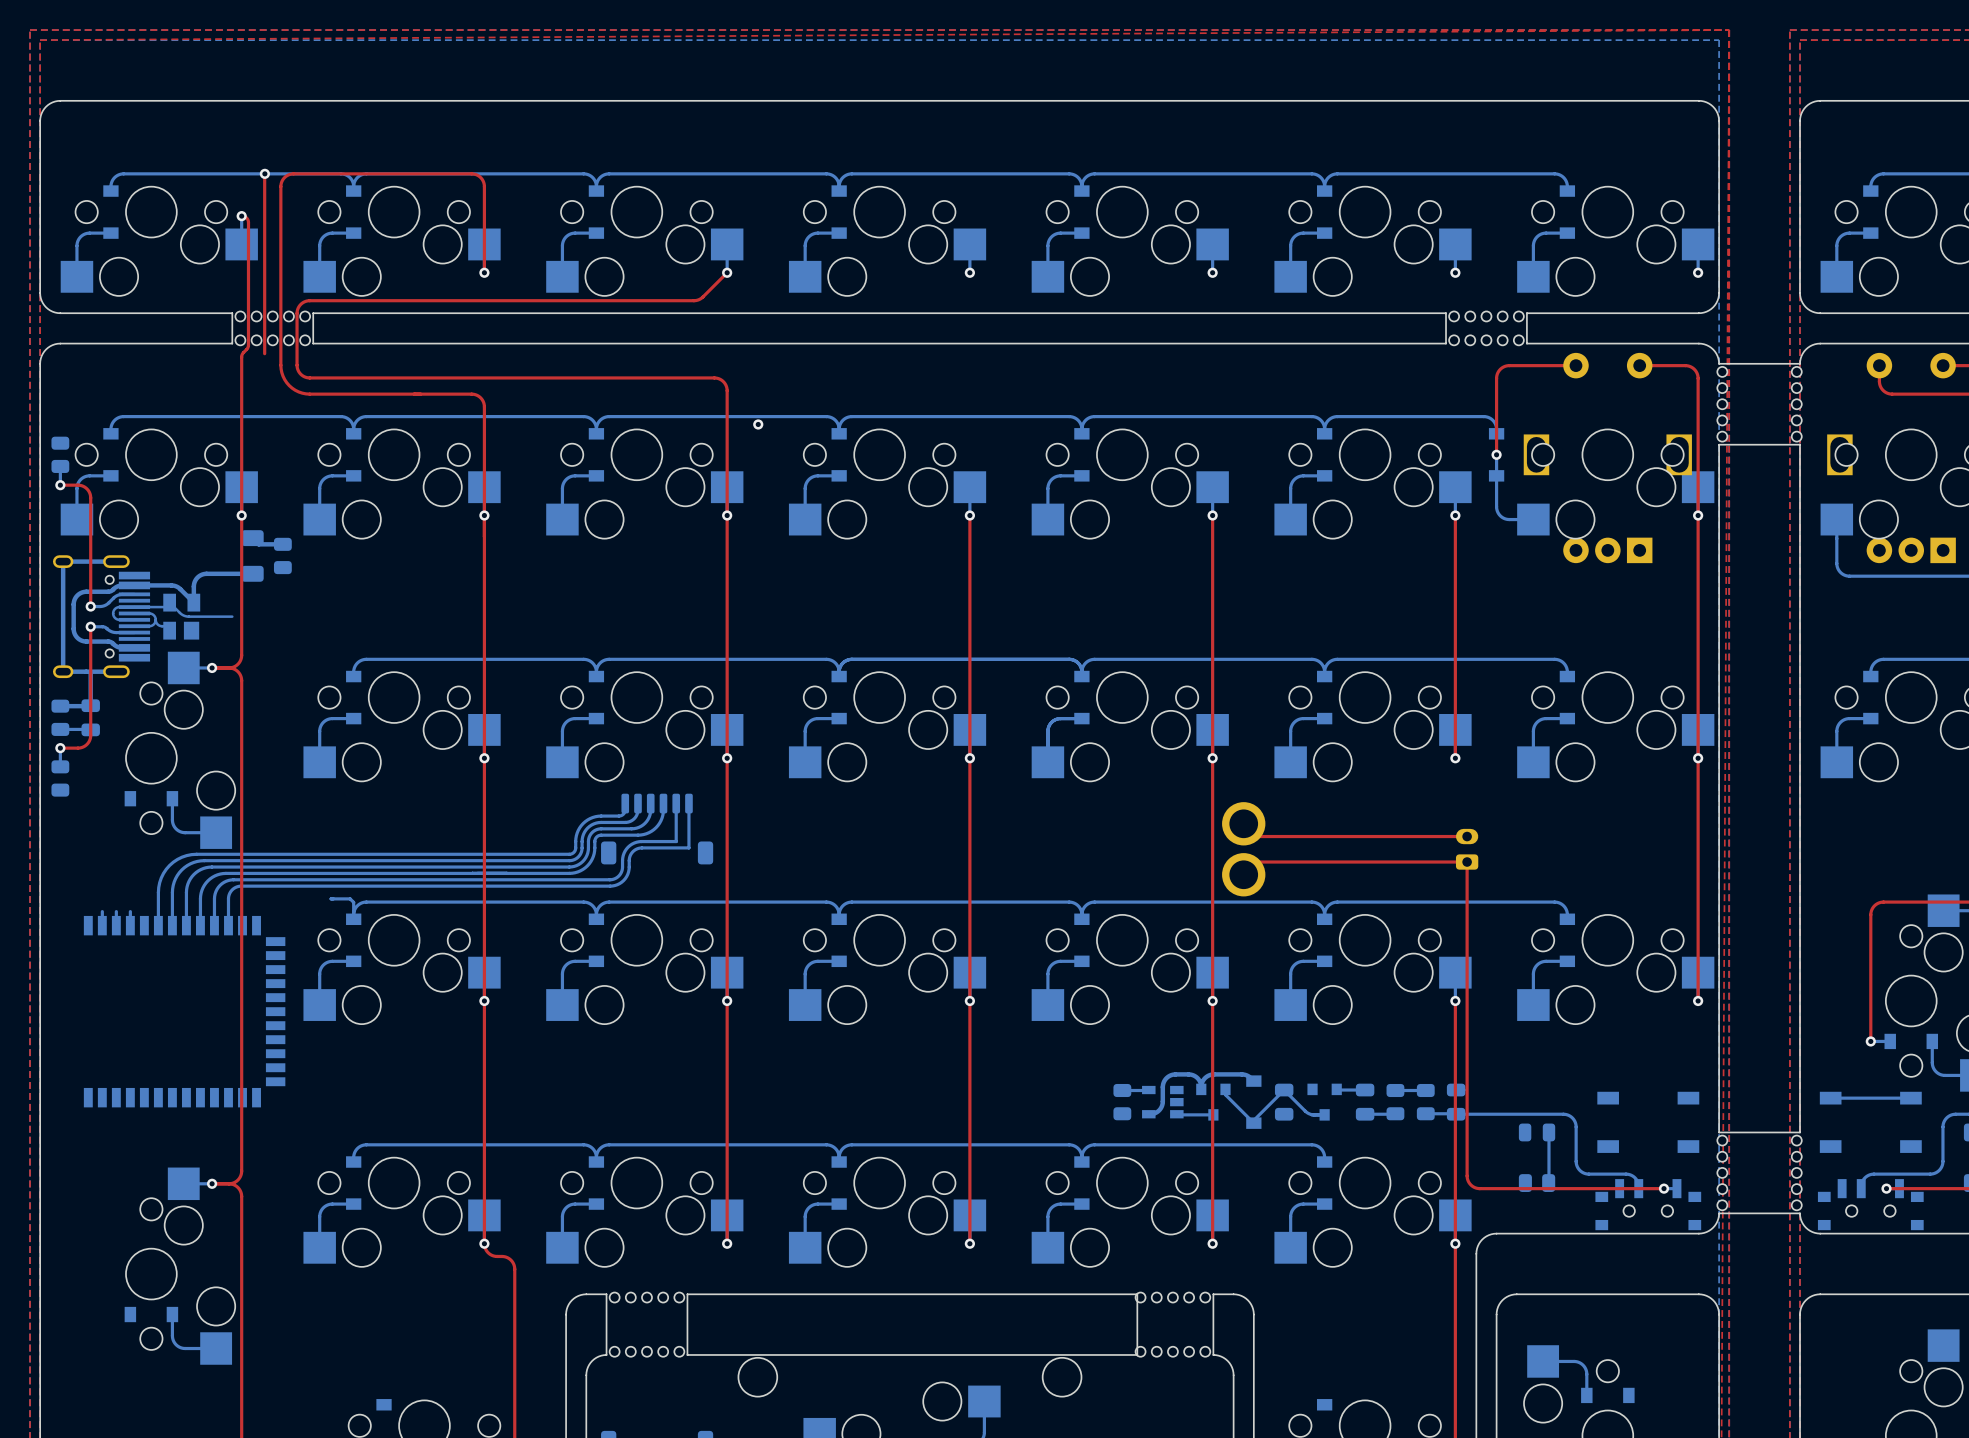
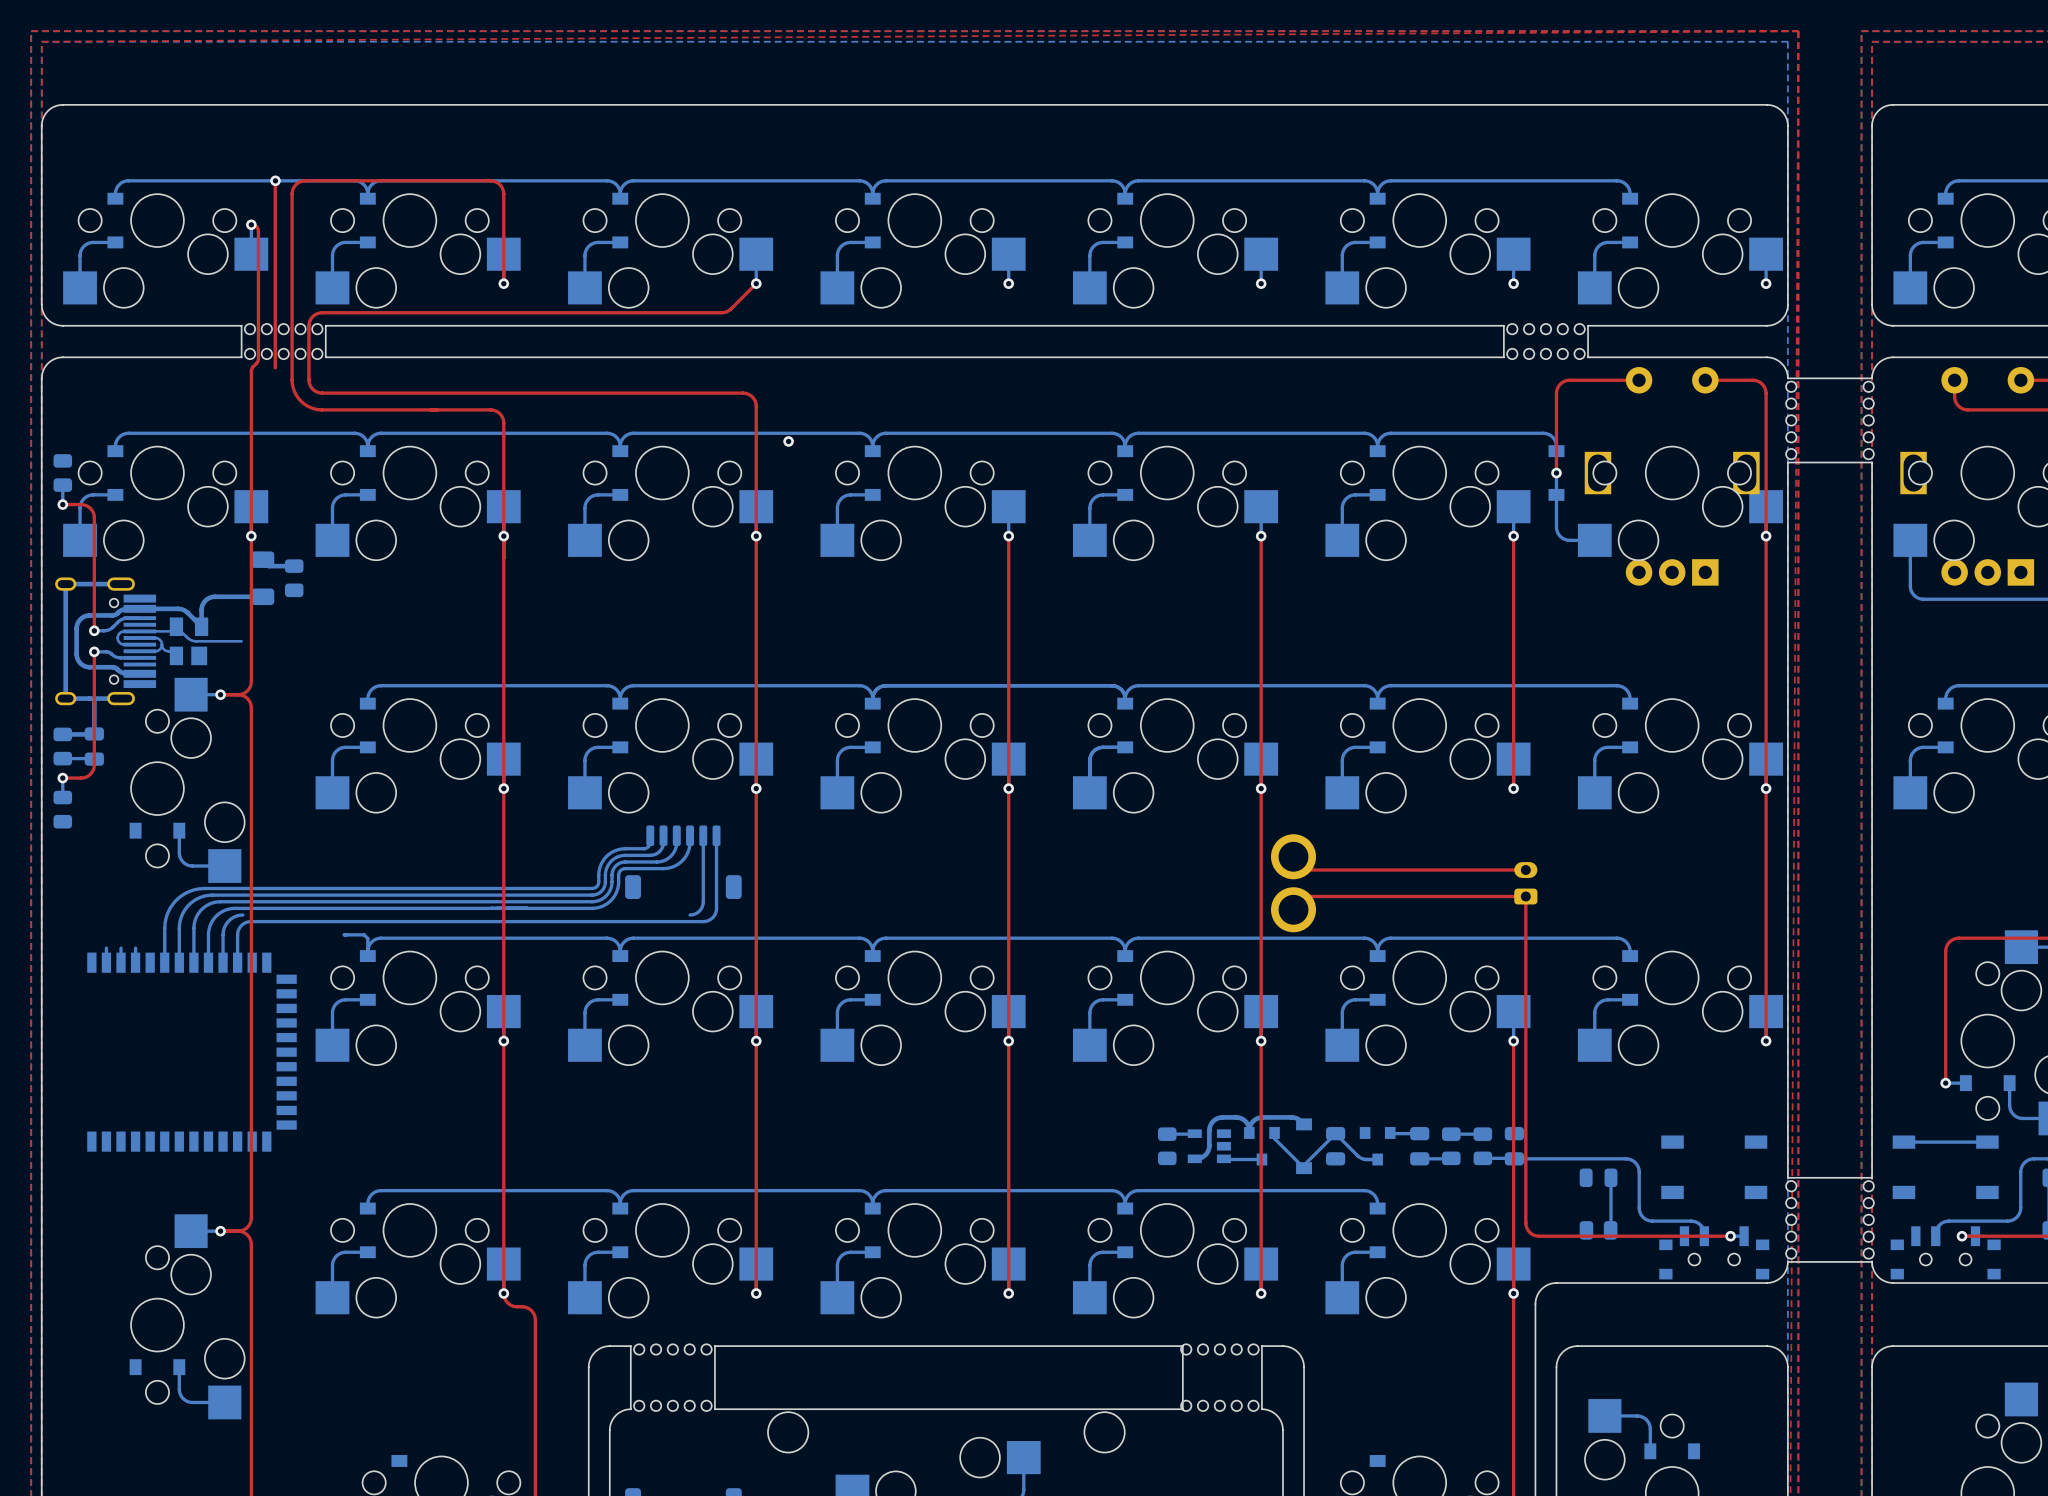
bottom track: (676, 841) (641, 841) (632, 844) (623, 853) (620, 873) (611, 879) (233, 879) -> (703, 875) (702, 906) (698, 912) (690, 914)
bottom track: (688, 847) (636, 849) (629, 856) (628, 871) (625, 878) (617, 884) (610, 886) -> (716, 881) (716, 911) (709, 920) (634, 921)

